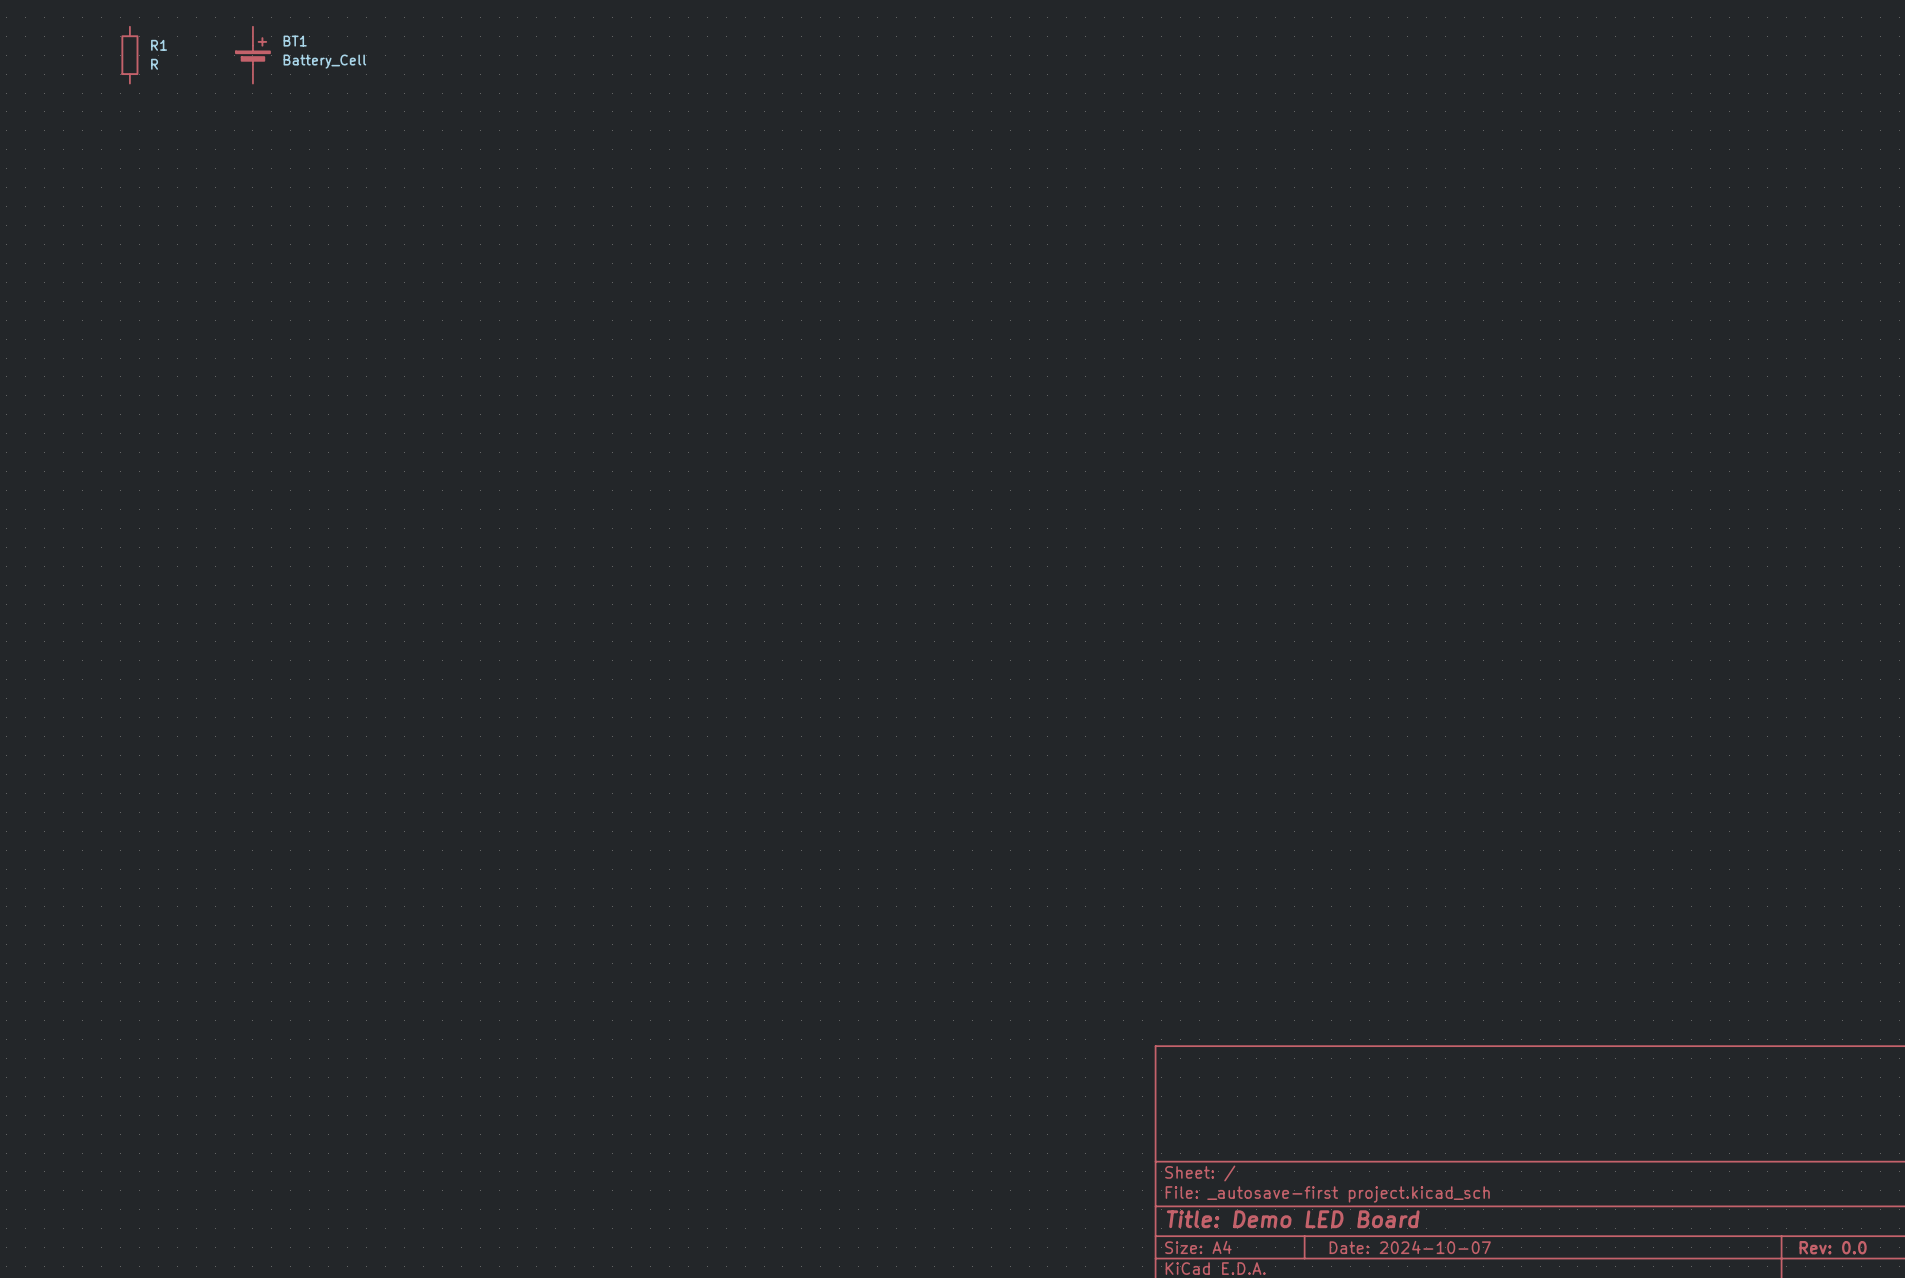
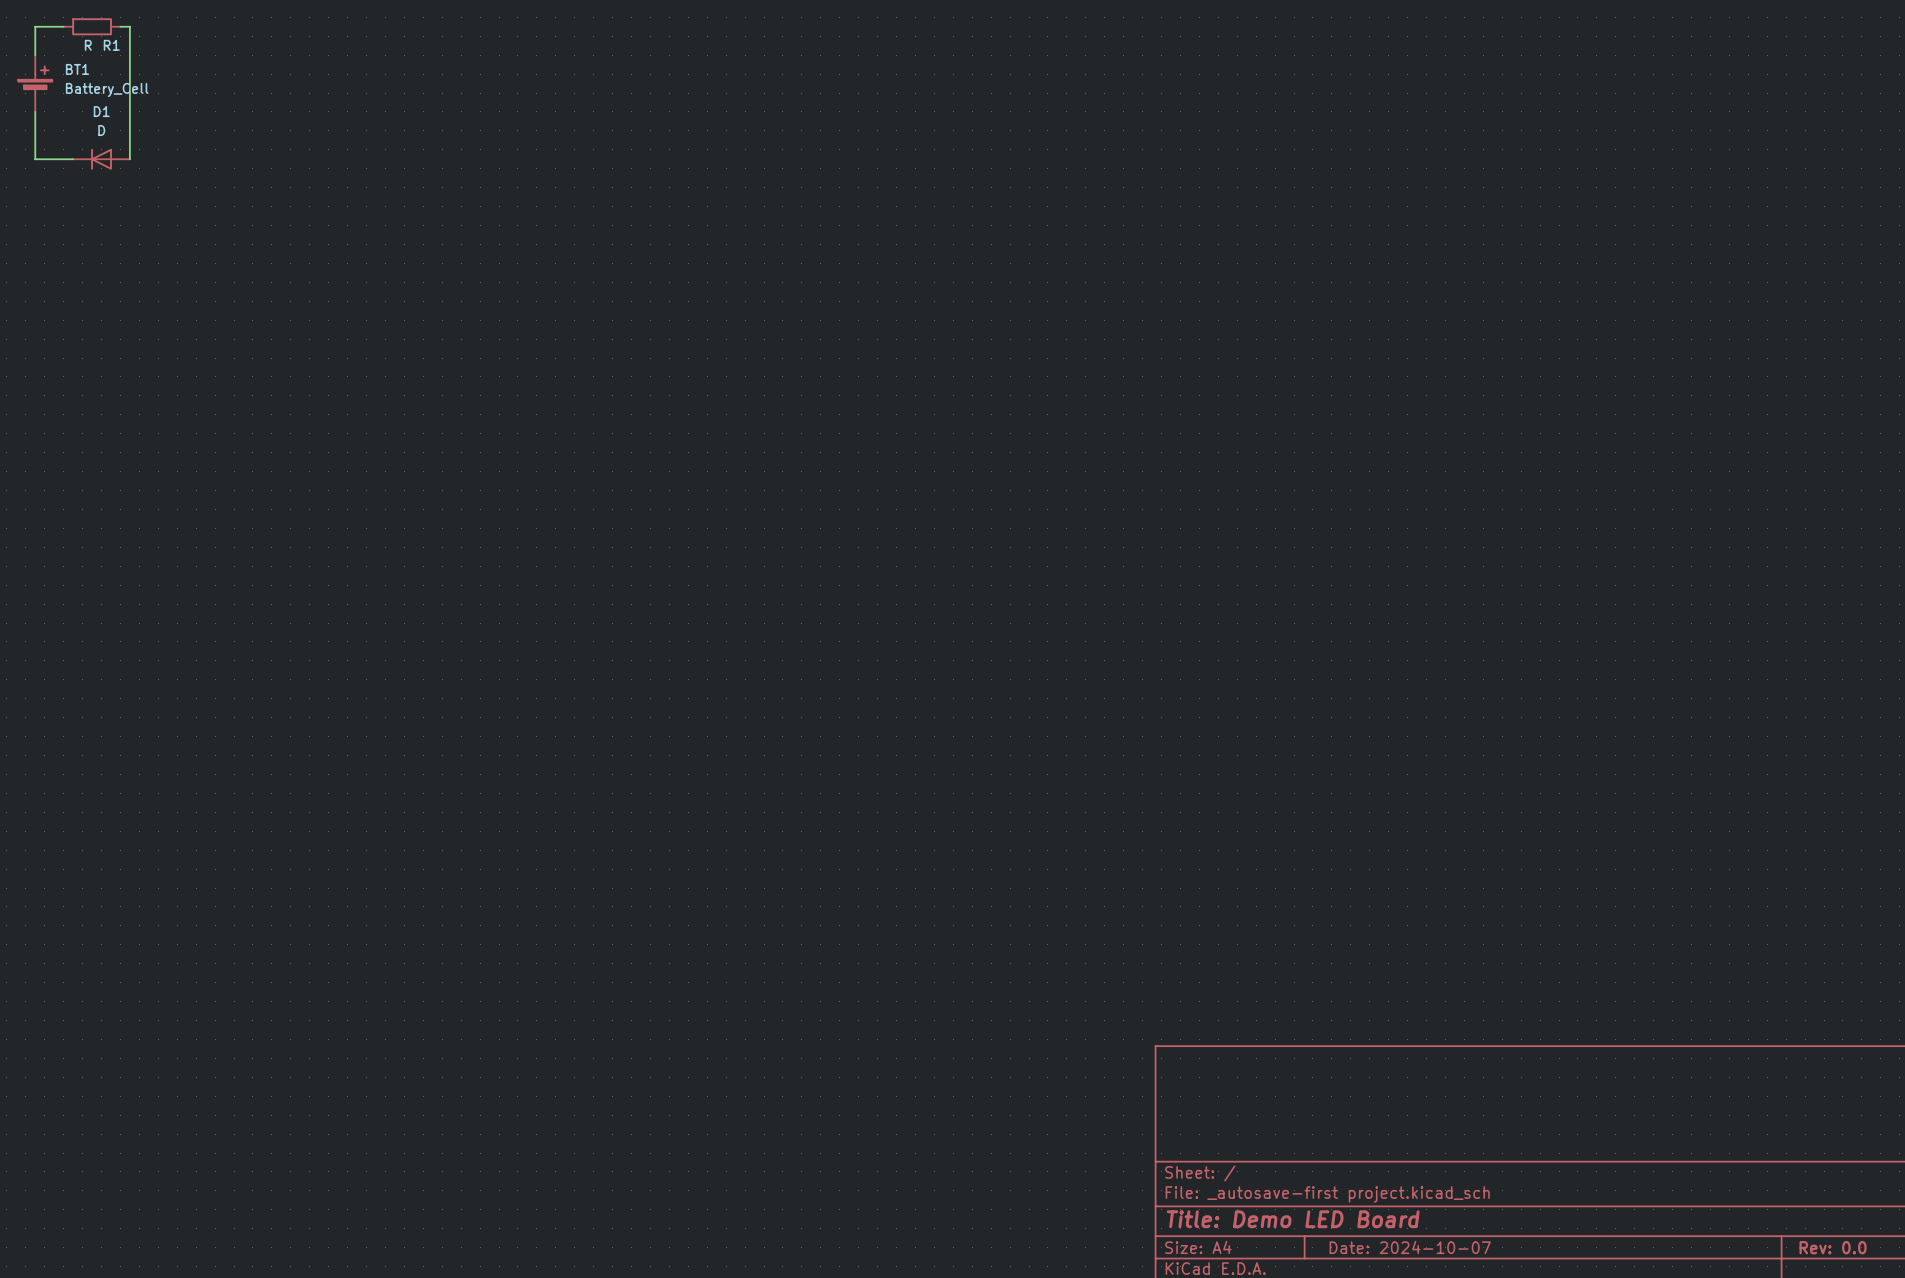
wire: none -> (63, 26) (35, 26) (35, 55)
wire: none -> (120, 26) (129, 26) (129, 159)
R1 name position: R1 (159, 45) -> R1 (111, 45)
R1 rotation: 0° (129, 55) -> 90° clockwise (92, 26)
R1 position: (129, 55) -> (92, 26)
BT1 position: (252, 55) -> (35, 83)
wire: none -> (35, 111) (35, 159) (73, 159)
D1: none -> D (101, 159)

